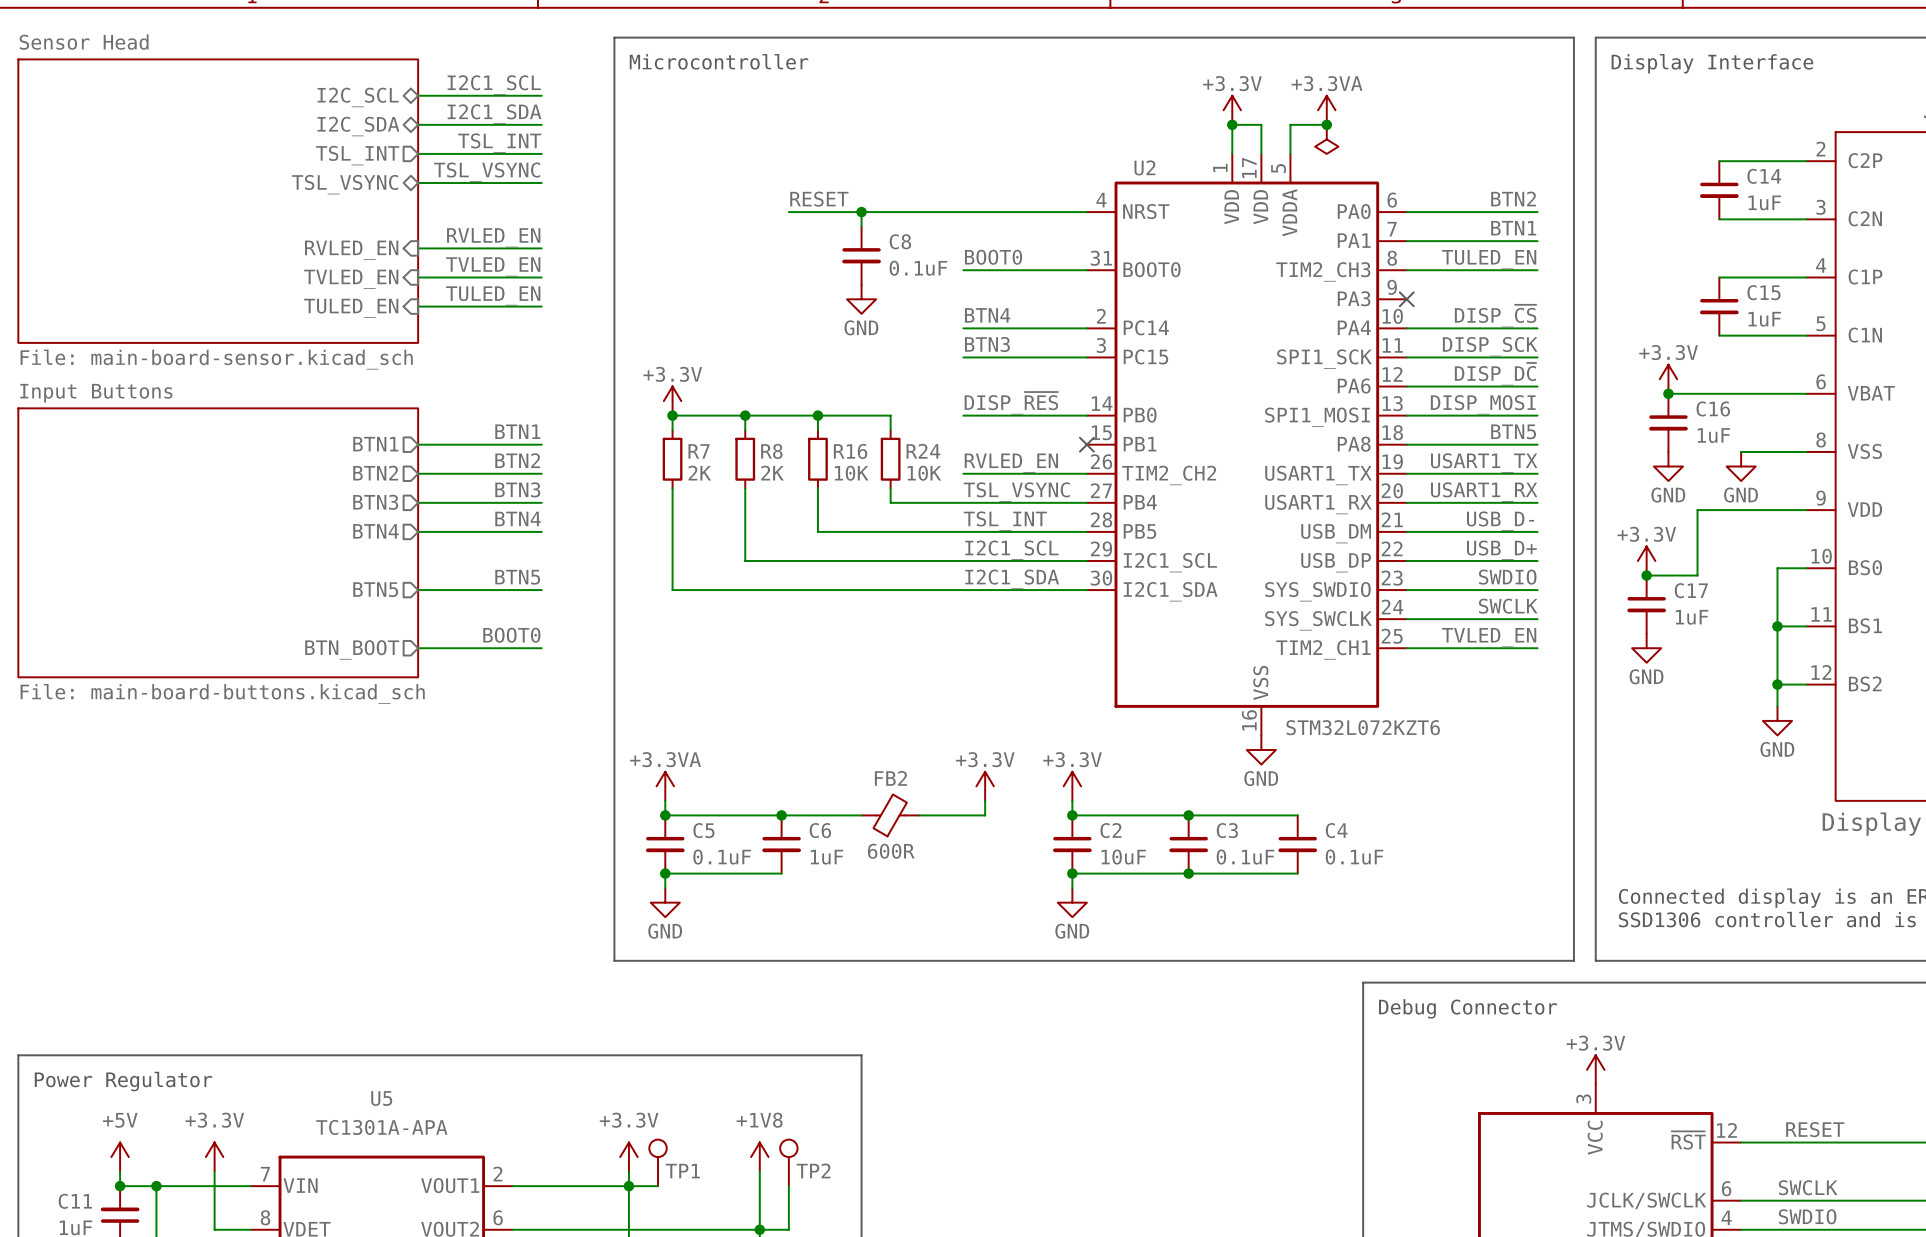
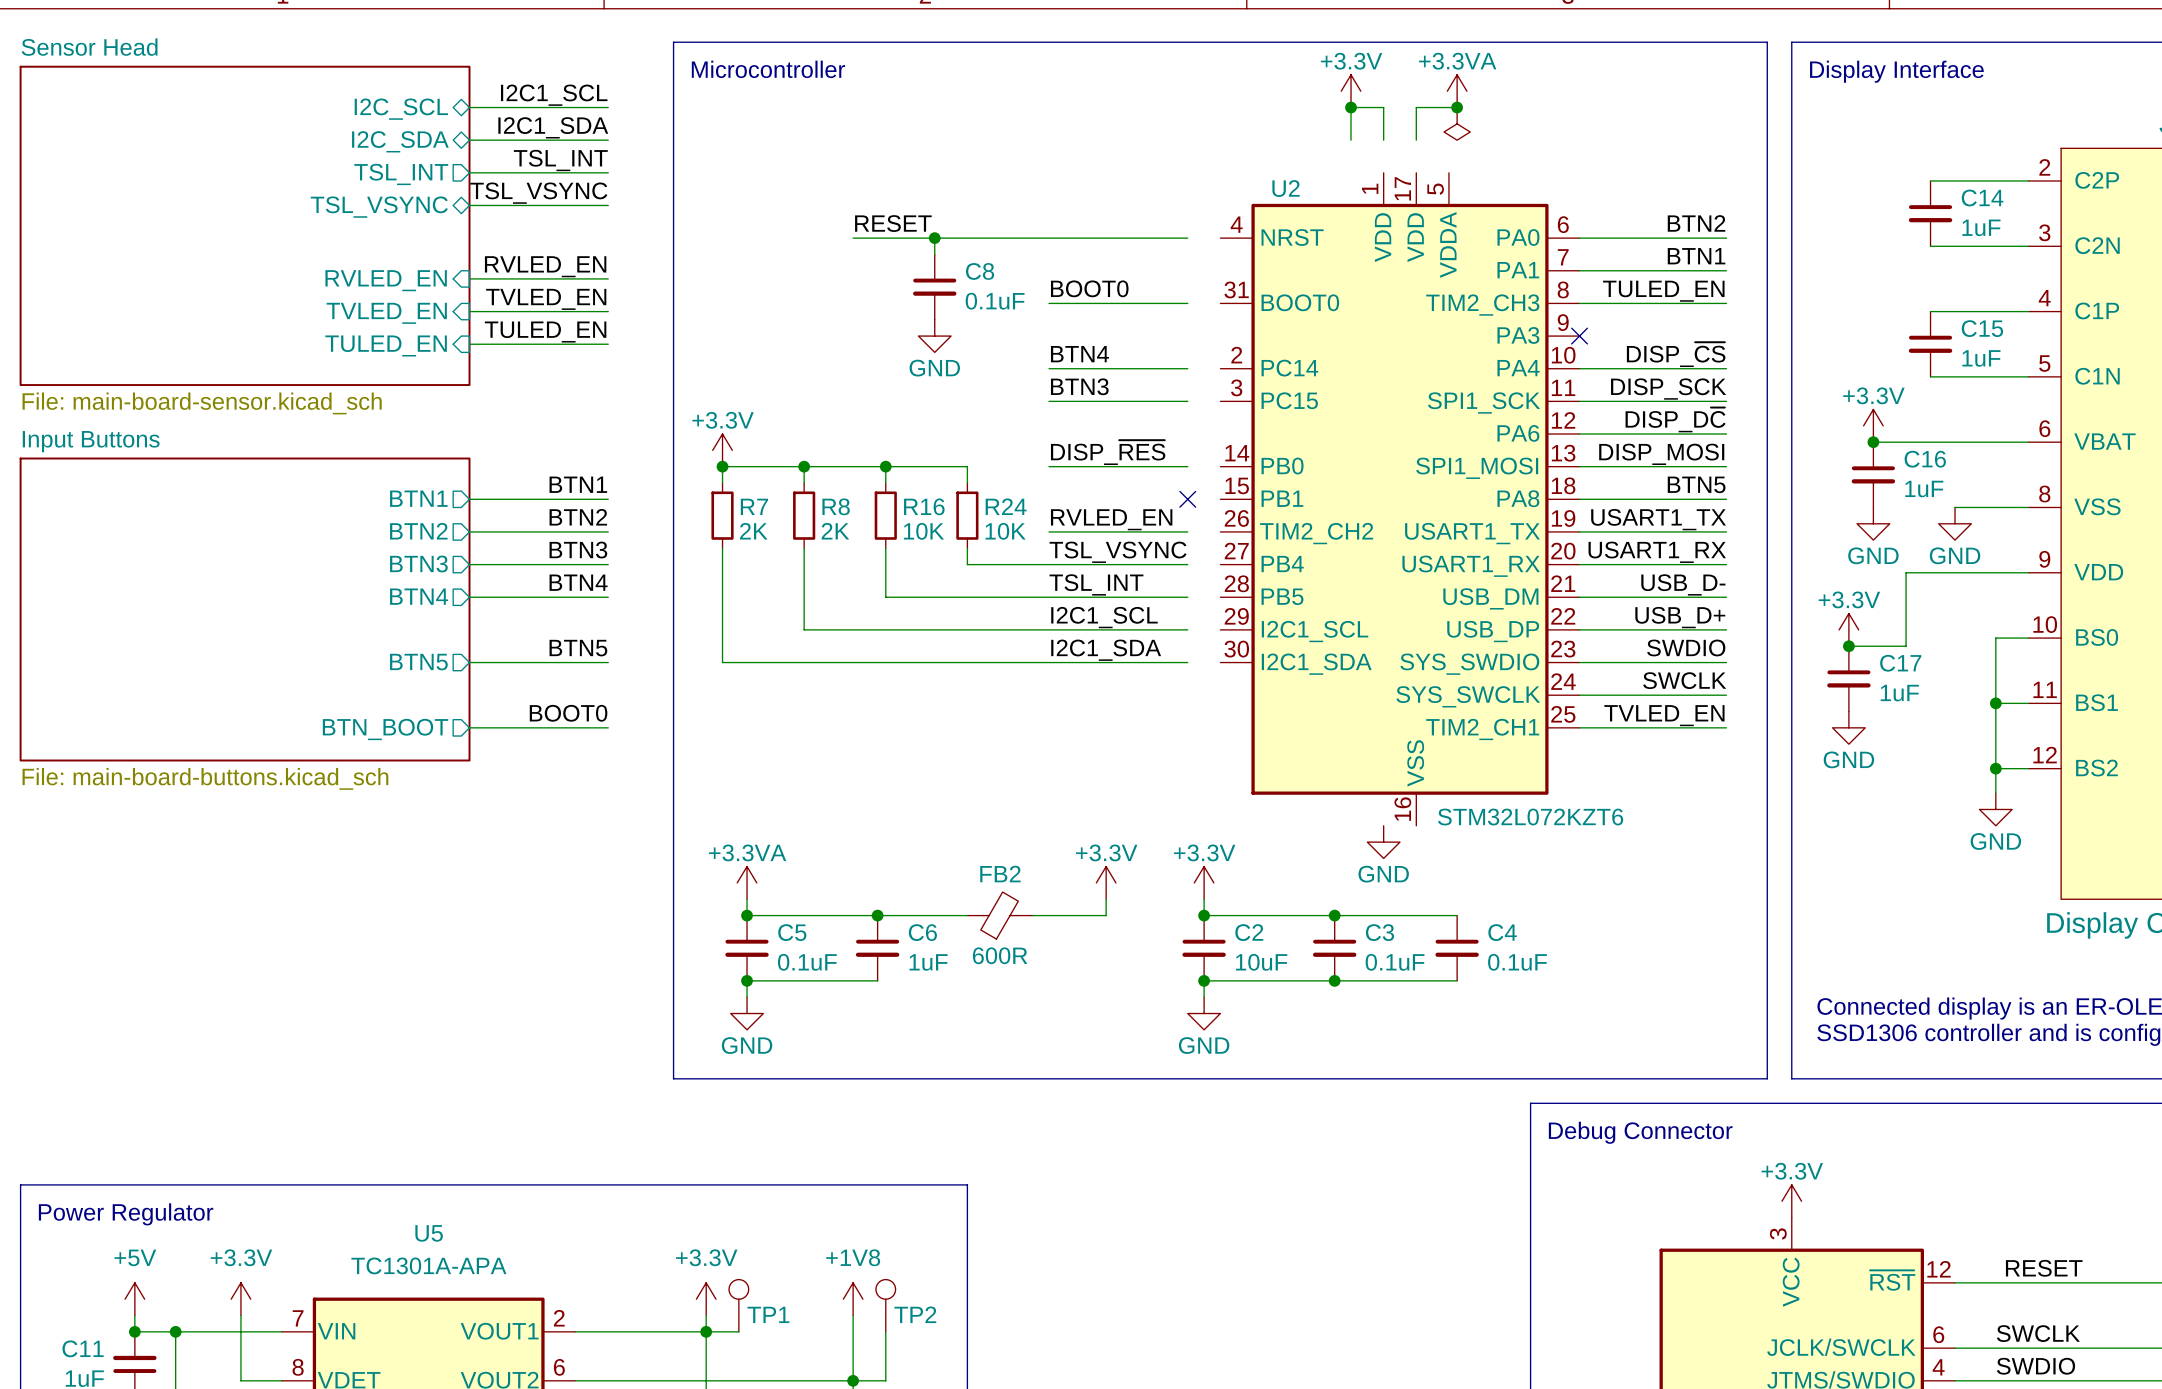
line: (614, 37) (614, 960) -> (689, 42) (673, 42) (673, 1078) (689, 1078)
text position: Microcontroller (719, 61) -> Microcontroller (768, 69)
junction: none -> (1351, 107)
junction: none -> (1457, 107)
power symbol position: +3.3V (1232, 110) -> +3.3V (1351, 91)
power symbol position: +3.3VA (1326, 110) -> +3.3VA (1457, 91)
junction: (1232, 124) -> none
wire: (1326, 124) (1290, 124) (1290, 153) -> (1457, 107) (1416, 107) (1416, 140)
junction: (1326, 124) -> none
power symbol position: (1326, 139) -> (1457, 123)
wire: (1232, 153) (1232, 124) (1261, 124) (1261, 153) -> (1351, 140) (1351, 107) (1383, 107) (1383, 140)
label position: RESET (819, 199) -> RESET (893, 223)
wire: none -> (853, 238) (885, 238)
wire: (861, 212) (861, 226) -> (934, 238) (934, 254)
junction position: (861, 212) -> (934, 238)
wire: (1057, 212) (1086, 212) -> none
C8 position: (861, 255) -> (934, 287)
label position: BOOT0 (993, 257) -> BOOT0 (1089, 288)
wire: (1057, 270) (1086, 270) -> (1049, 303) (1081, 303)
power symbol position: GND (861, 299) -> GND (934, 336)
label position: BTN4 (987, 315) -> BTN4 (1079, 354)
wire: (1057, 328) (1086, 328) -> (1049, 368) (1081, 368)
label position: BTN3 (987, 344) -> BTN3 (1079, 386)
wire: (1057, 357) (1086, 357) -> (1049, 401) (1081, 401)
power symbol position: +3.3V (672, 401) -> +3.3V (722, 450)
label position: DISP_~{RES} (1011, 403) -> DISP_~{RES} (1108, 452)
junction: none -> (722, 466)
wire: (672, 415) (672, 430) -> (755, 466) (722, 466) (722, 482)
junction: (672, 415) -> none
junction: none -> (804, 466)
wire: (745, 415) (745, 430) -> (804, 466) (804, 482)
junction: (745, 415) -> none
junction: none -> (885, 466)
wire: (817, 415) (817, 430) -> (885, 466) (885, 482)
junction: (817, 415) -> none
wire: (861, 415) (890, 415) (890, 430) -> (967, 466) (967, 482)
wire: (1057, 415) (1086, 415) -> (1049, 466) (1081, 466)
no-connect mark position: (1086, 444) -> (1187, 499)
R7 position: (672, 459) -> (722, 515)
R8 position: (745, 459) -> (804, 515)
R16 position: (817, 459) -> (885, 515)
R24 position: (890, 459) -> (967, 515)
label position: RVLED_EN (1011, 463) -> RVLED_EN (1111, 519)
wire: (1057, 473) (1086, 473) -> (1049, 531) (1081, 531)
wire: (672, 488) (672, 590) -> (722, 548) (722, 662) (755, 662)
wire: (745, 488) (745, 561) -> (804, 548) (804, 629) (836, 629)
wire: (817, 488) (817, 531) -> (885, 548) (885, 597) (918, 597)
wire: (890, 488) (890, 502) -> (967, 548) (967, 564) (1000, 564)
label position: TSL_VSYNC (1016, 492) -> TSL_VSYNC (1118, 552)
wire: (1057, 502) (1086, 502) -> none
label position: TSL_INT (1005, 521) -> TSL_INT (1096, 584)
wire: (1057, 531) (1086, 531) -> none
label position: I2C1_SCL (1011, 550) -> I2C1_SCL (1104, 617)
wire: (1057, 561) (1086, 561) -> none
label position: I2C1_SDA (1012, 579) -> I2C1_SDA (1106, 650)
wire: (1057, 590) (1086, 590) -> none
power symbol position: GND (1261, 750) -> GND (1383, 842)

